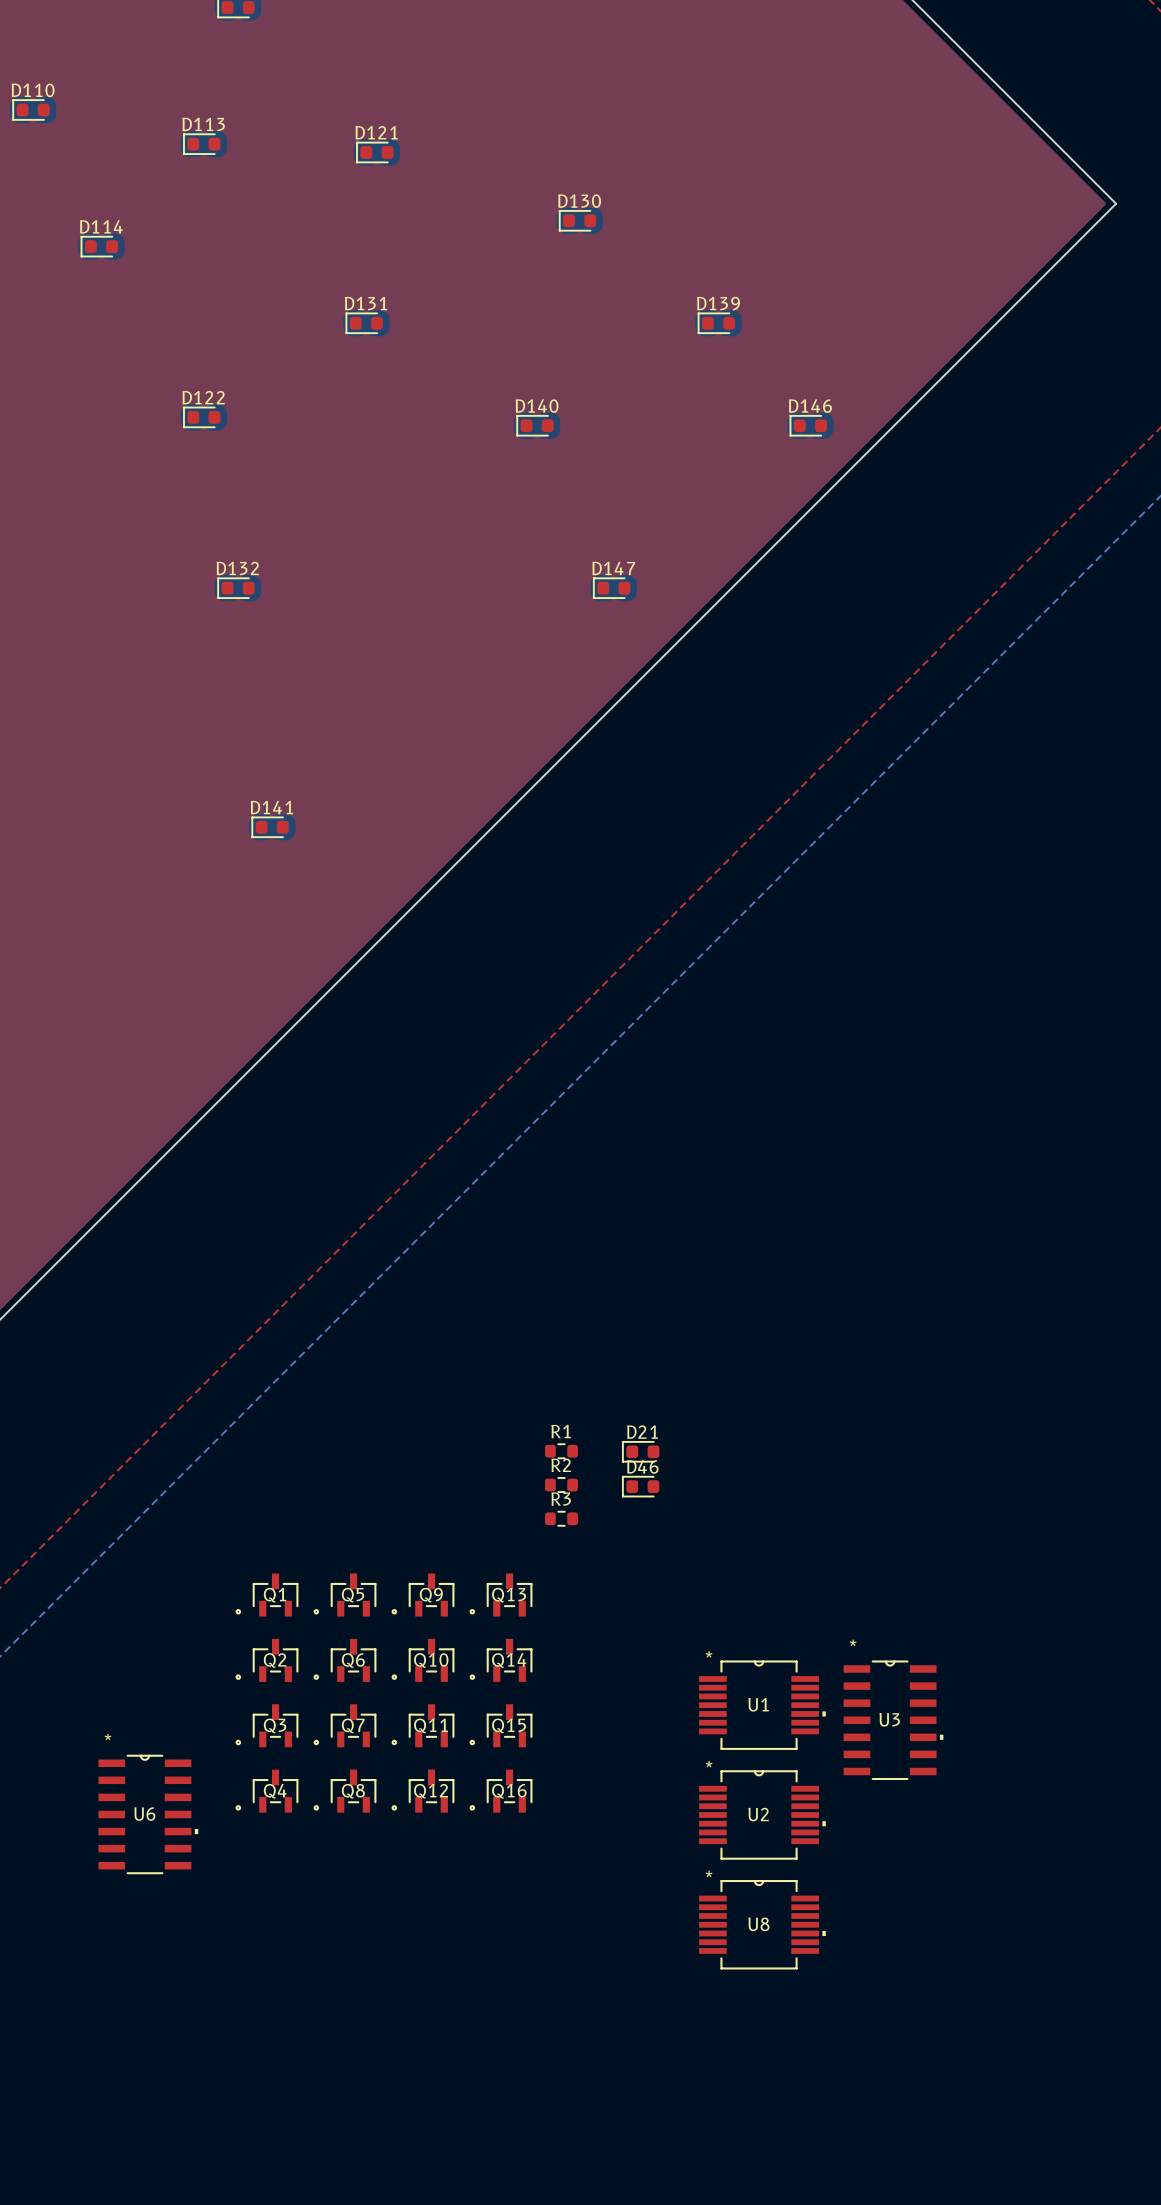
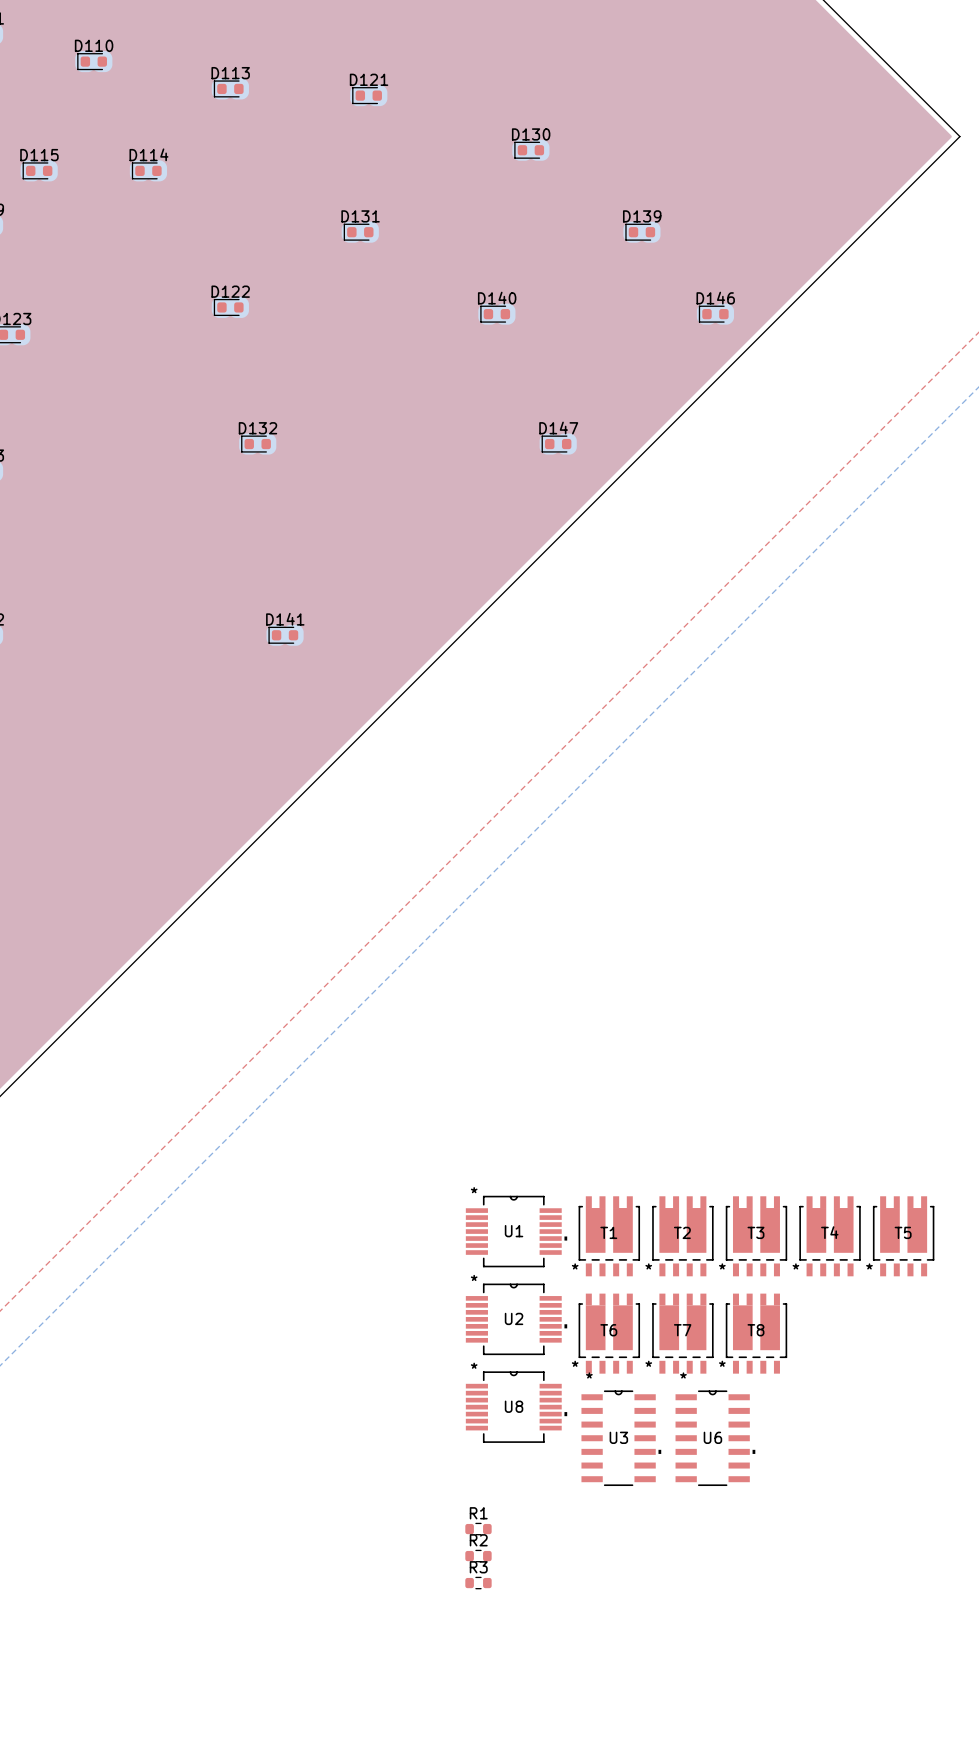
R1 position: (561, 1451) -> (478, 1529)
D21: (640, 1451) -> none
R2 position: (561, 1485) -> (478, 1556)
D46: (640, 1486) -> none
R3 position: (561, 1518) -> (478, 1583)
T1: none -> (609, 1236)
T2: none -> (682, 1236)
T3: none -> (756, 1236)
T4: none -> (830, 1236)
T5: none -> (903, 1236)
Q1: (267, 1595) -> none
Q5: (345, 1595) -> none
Q9: (423, 1595) -> none
Q13: (501, 1595) -> none
Q2: (267, 1660) -> none
Q6: (345, 1660) -> none
Q10: (423, 1660) -> none
Q14: (501, 1660) -> none
T6: none -> (609, 1333)
T7: none -> (682, 1333)
T8: none -> (756, 1333)
U1 position: (762, 1705) -> (516, 1231)
U3 position: (893, 1720) -> (621, 1438)
Q3: (267, 1725) -> none
Q7: (345, 1725) -> none
Q11: (423, 1725) -> none
Q15: (501, 1725) -> none
Q4: (267, 1791) -> none
Q8: (345, 1791) -> none
Q12: (423, 1791) -> none
Q16: (501, 1791) -> none
U6 position: (148, 1814) -> (715, 1438)
U2 position: (762, 1814) -> (516, 1319)
U8 position: (762, 1924) -> (516, 1407)

